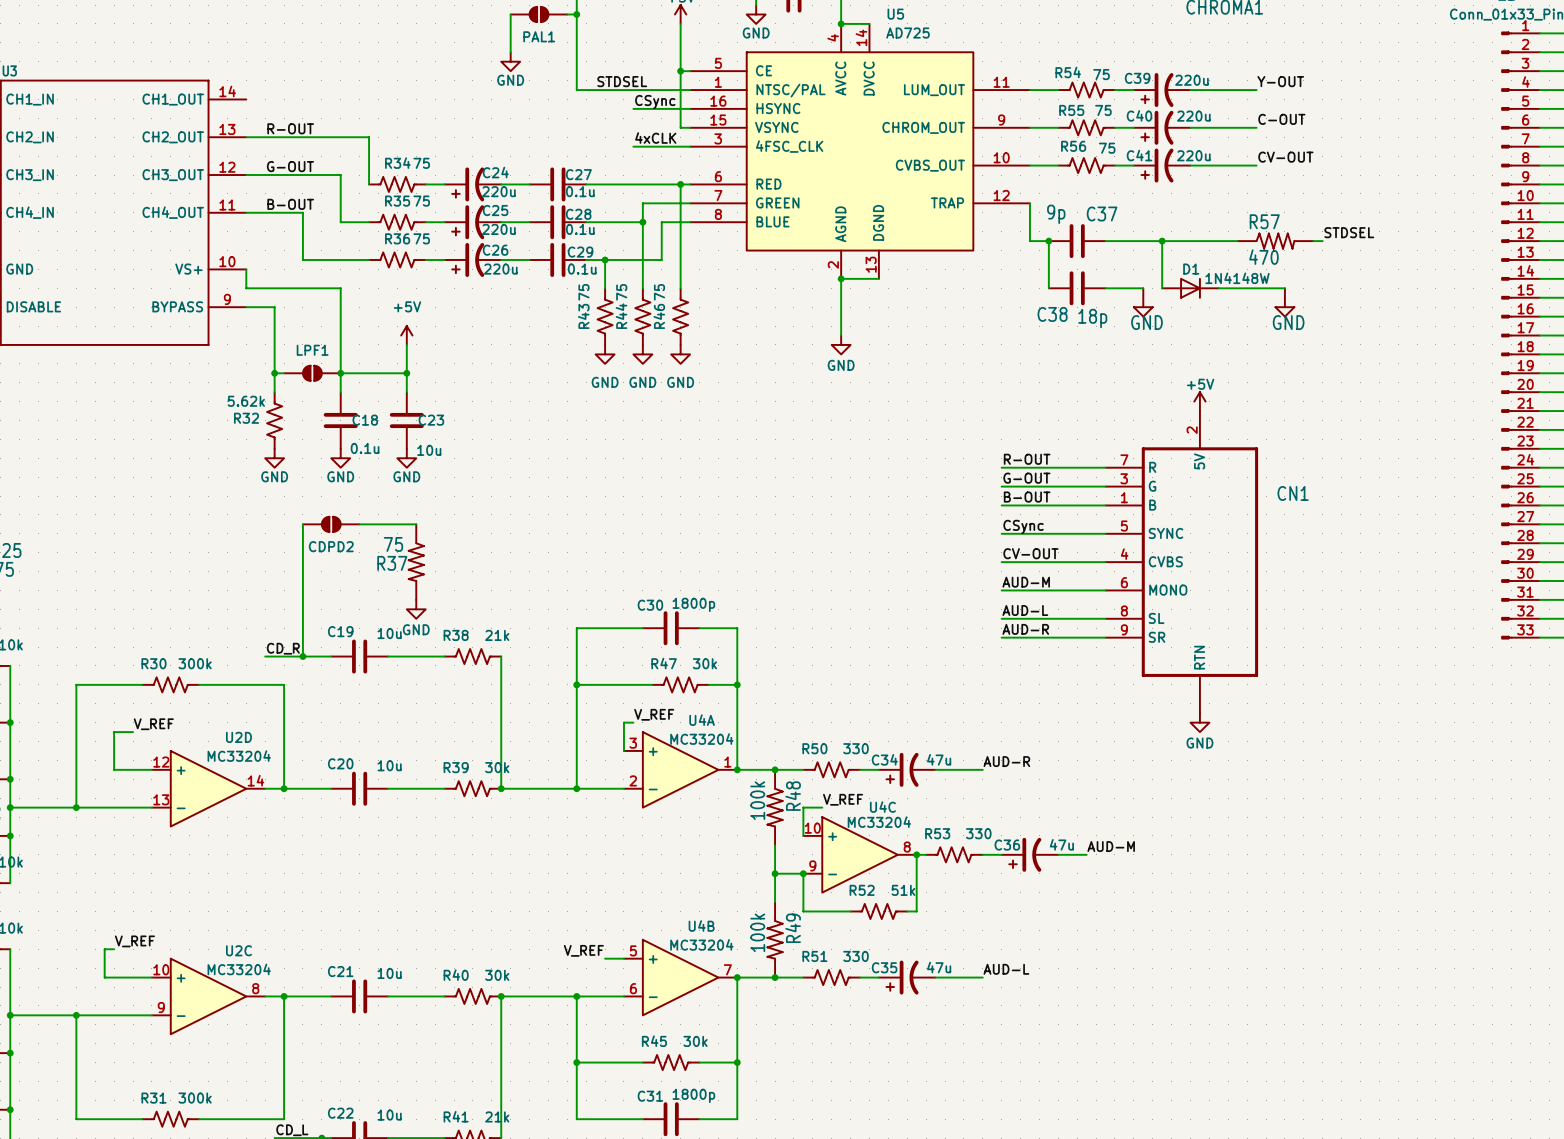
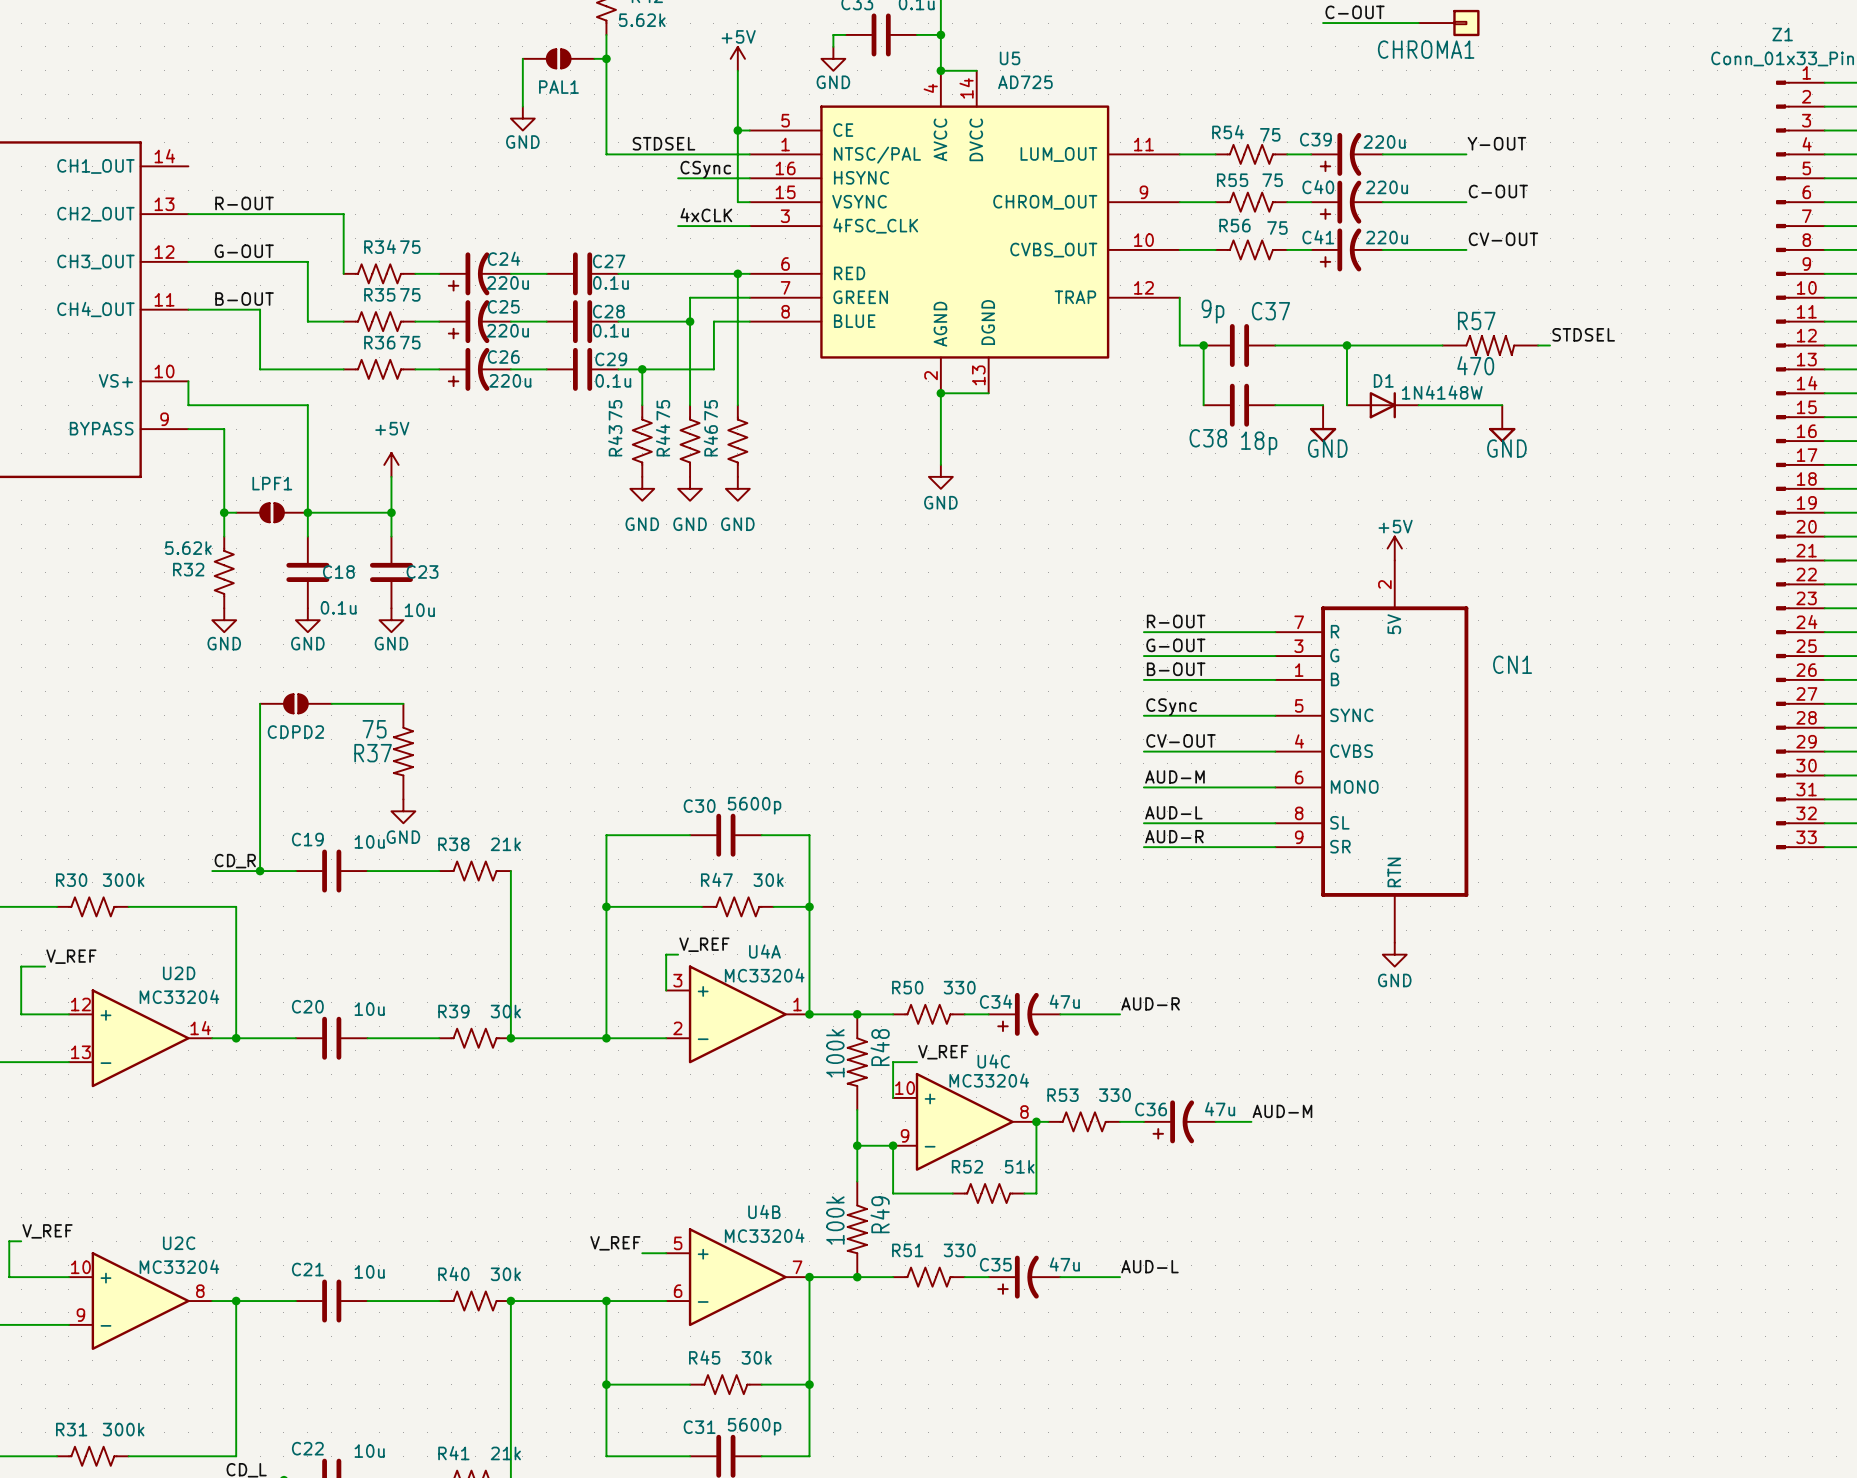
C30 value: 1800p (693, 604) -> 5600p (754, 805)
C31 value: 1800p (693, 1095) -> 5600p (754, 1426)

